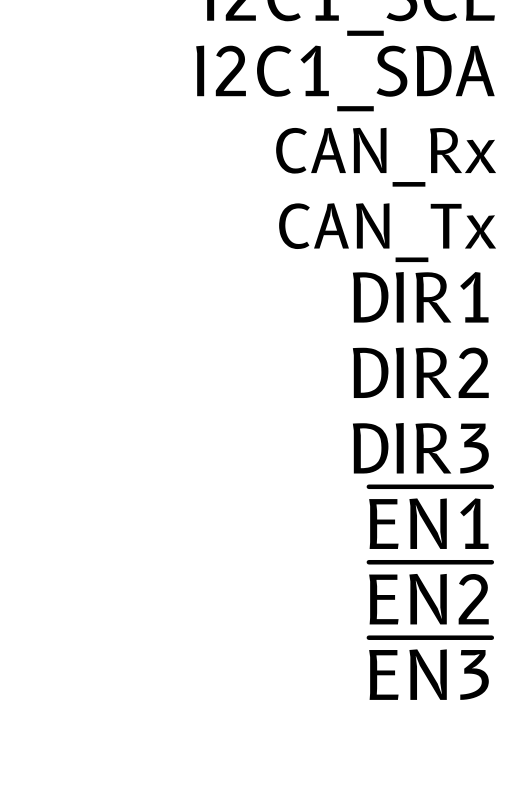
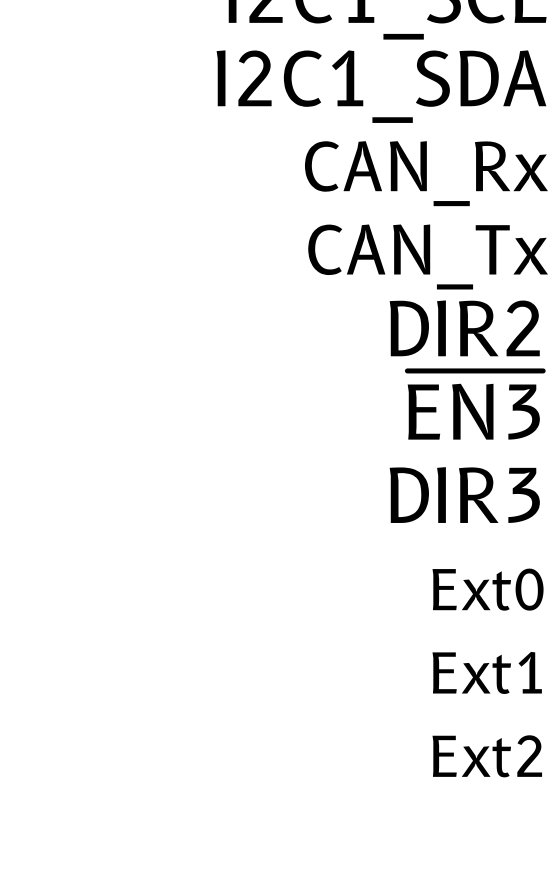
label: DIR1 (420, 297) -> DIR2 (464, 328)
label: DIR2 (420, 372) -> ~{EN3} (475, 405)
label: ~{EN1} (430, 517) -> Ext0 (488, 589)
label: ~{EN2} (430, 593) -> Ext1 (487, 672)
label: ~{EN3} (430, 668) -> Ext2 (487, 756)

